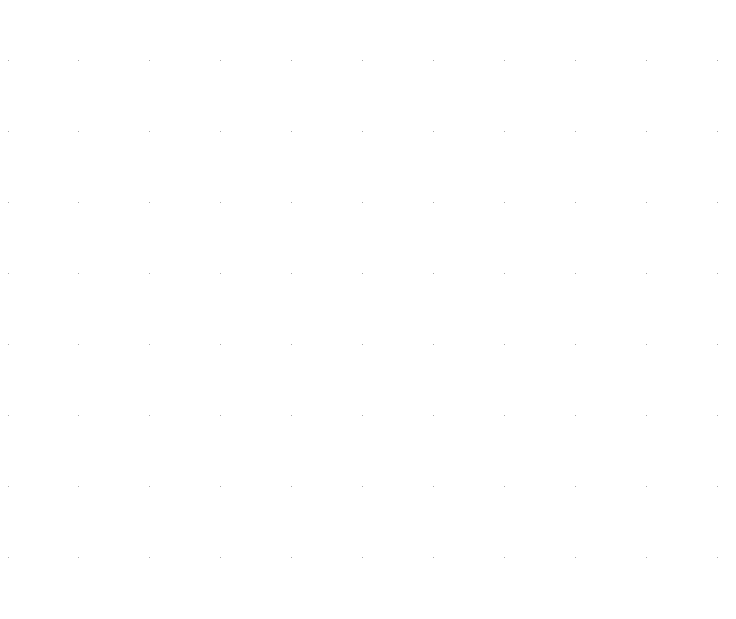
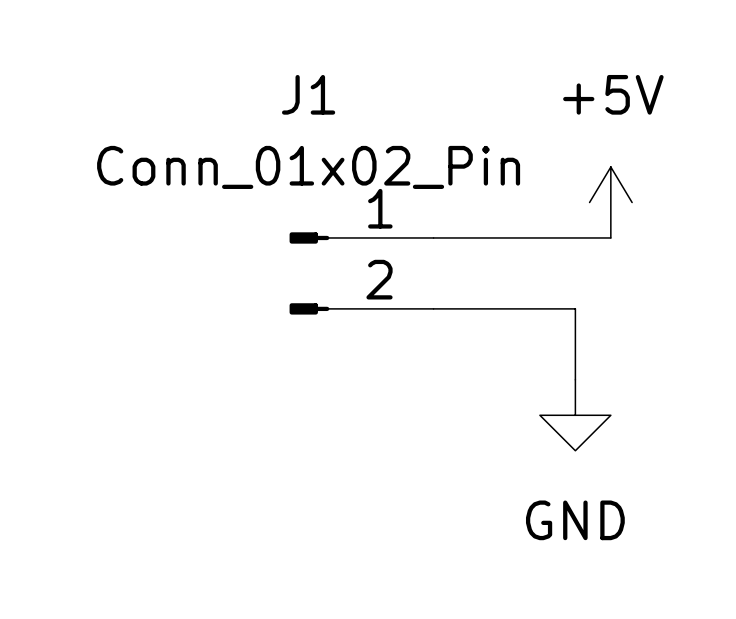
power symbol: none -> +5V (610, 202)
wire: none -> (433, 237) (610, 237)
J1: none -> Conn_01x02_Pin (361, 273)
wire: none -> (433, 308) (575, 308) (575, 379)
power symbol: none -> GND (575, 415)

